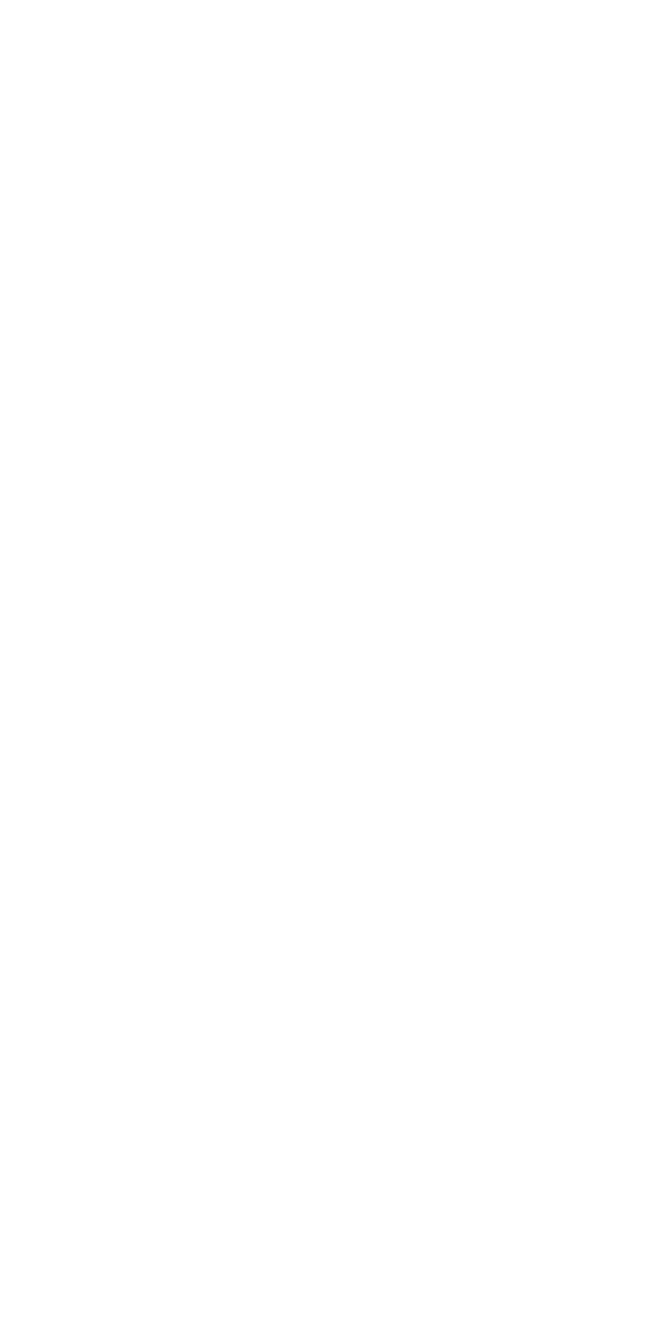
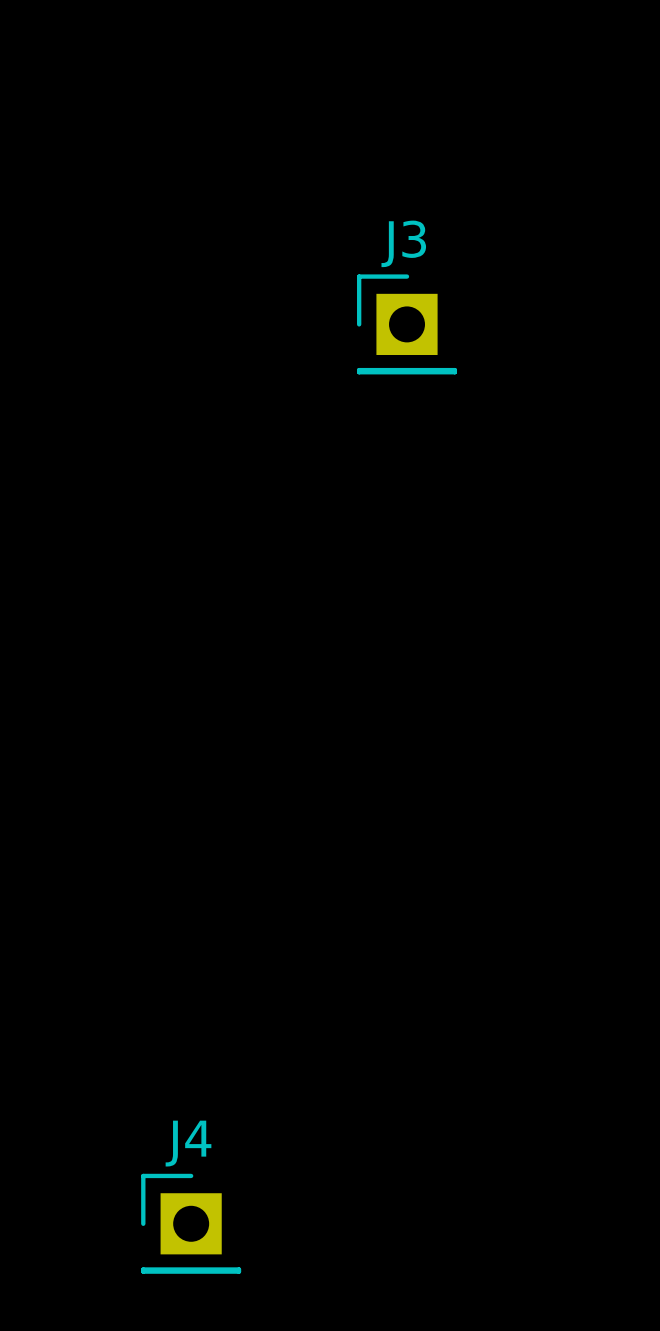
J3: none -> (407, 324)
J4: none -> (191, 1223)

